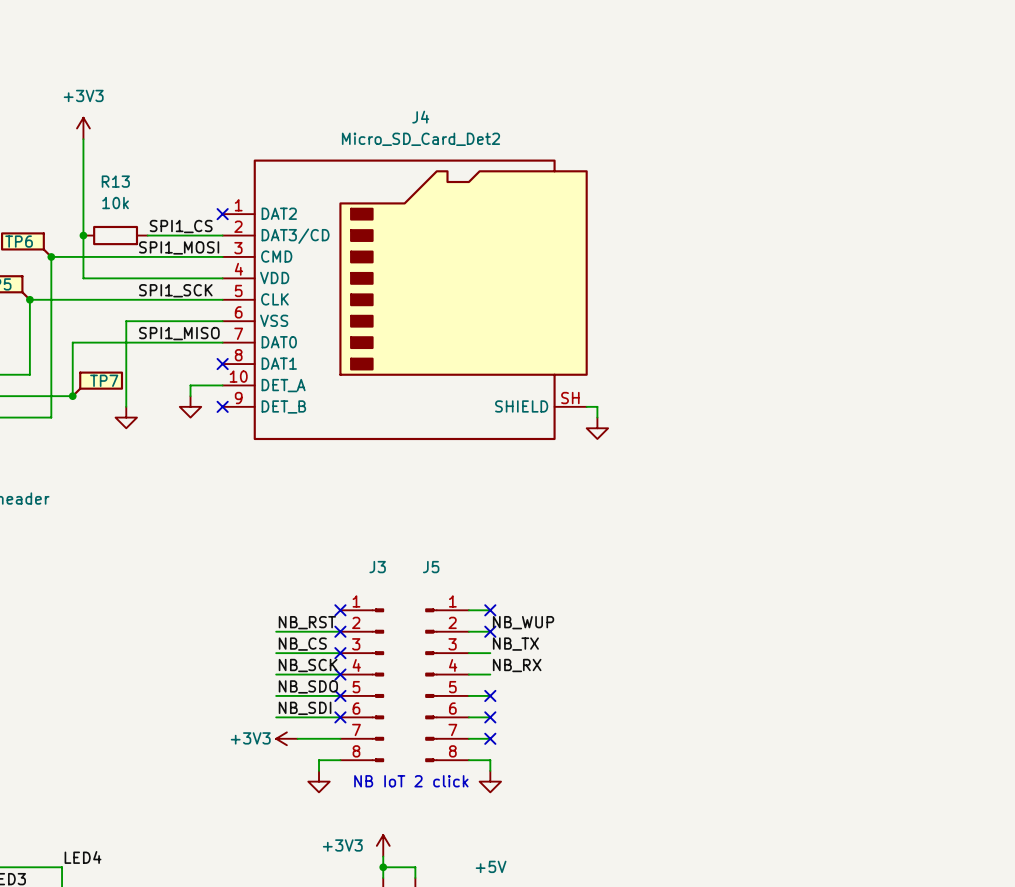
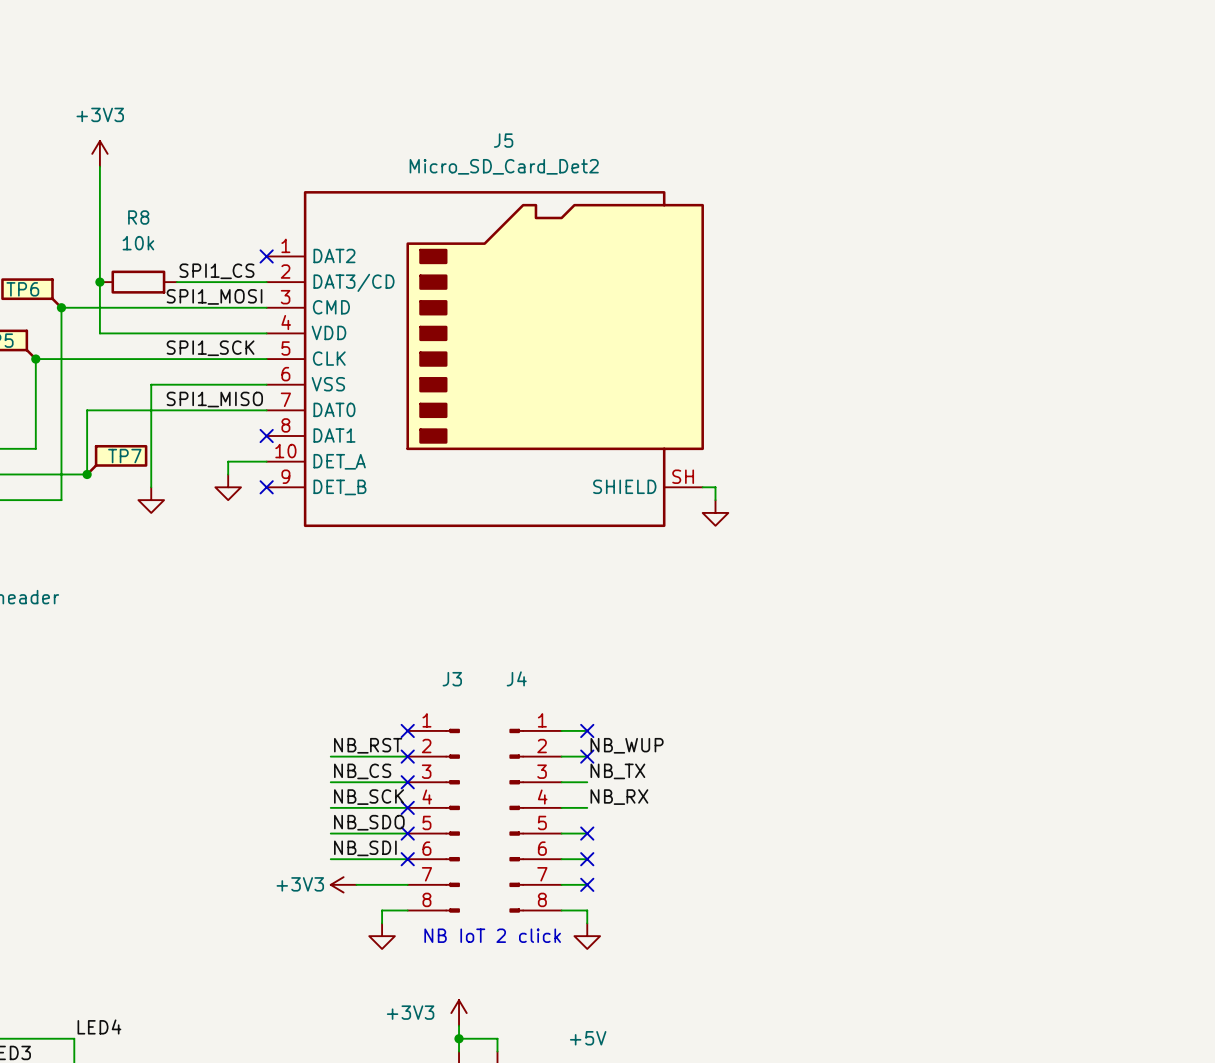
J4 name: J4 (420, 117) -> J5 (503, 140)
R13 name: R13 (115, 181) -> R8 (138, 217)
J5 name: J5 (431, 567) -> J4 (516, 678)

